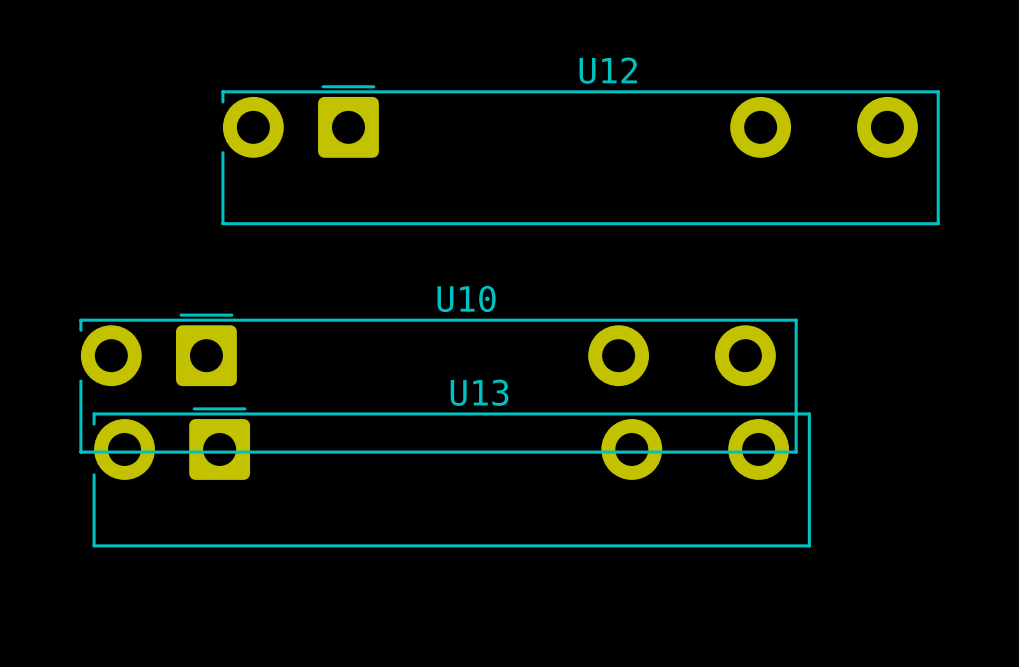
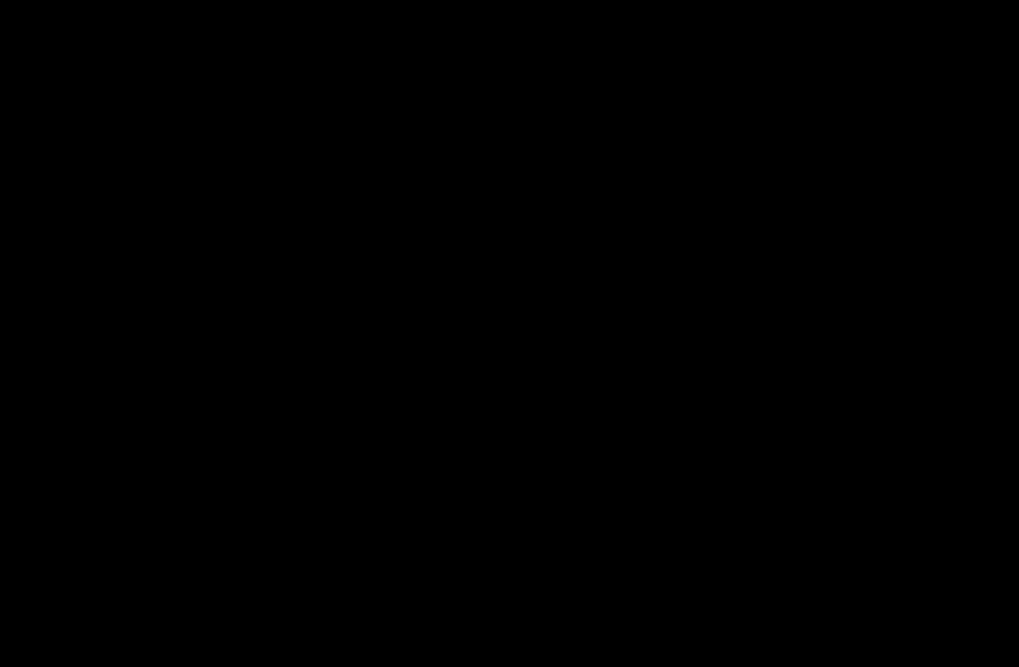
U12: (580, 155) -> none
U10: (438, 383) -> none
U13: (451, 477) -> none

